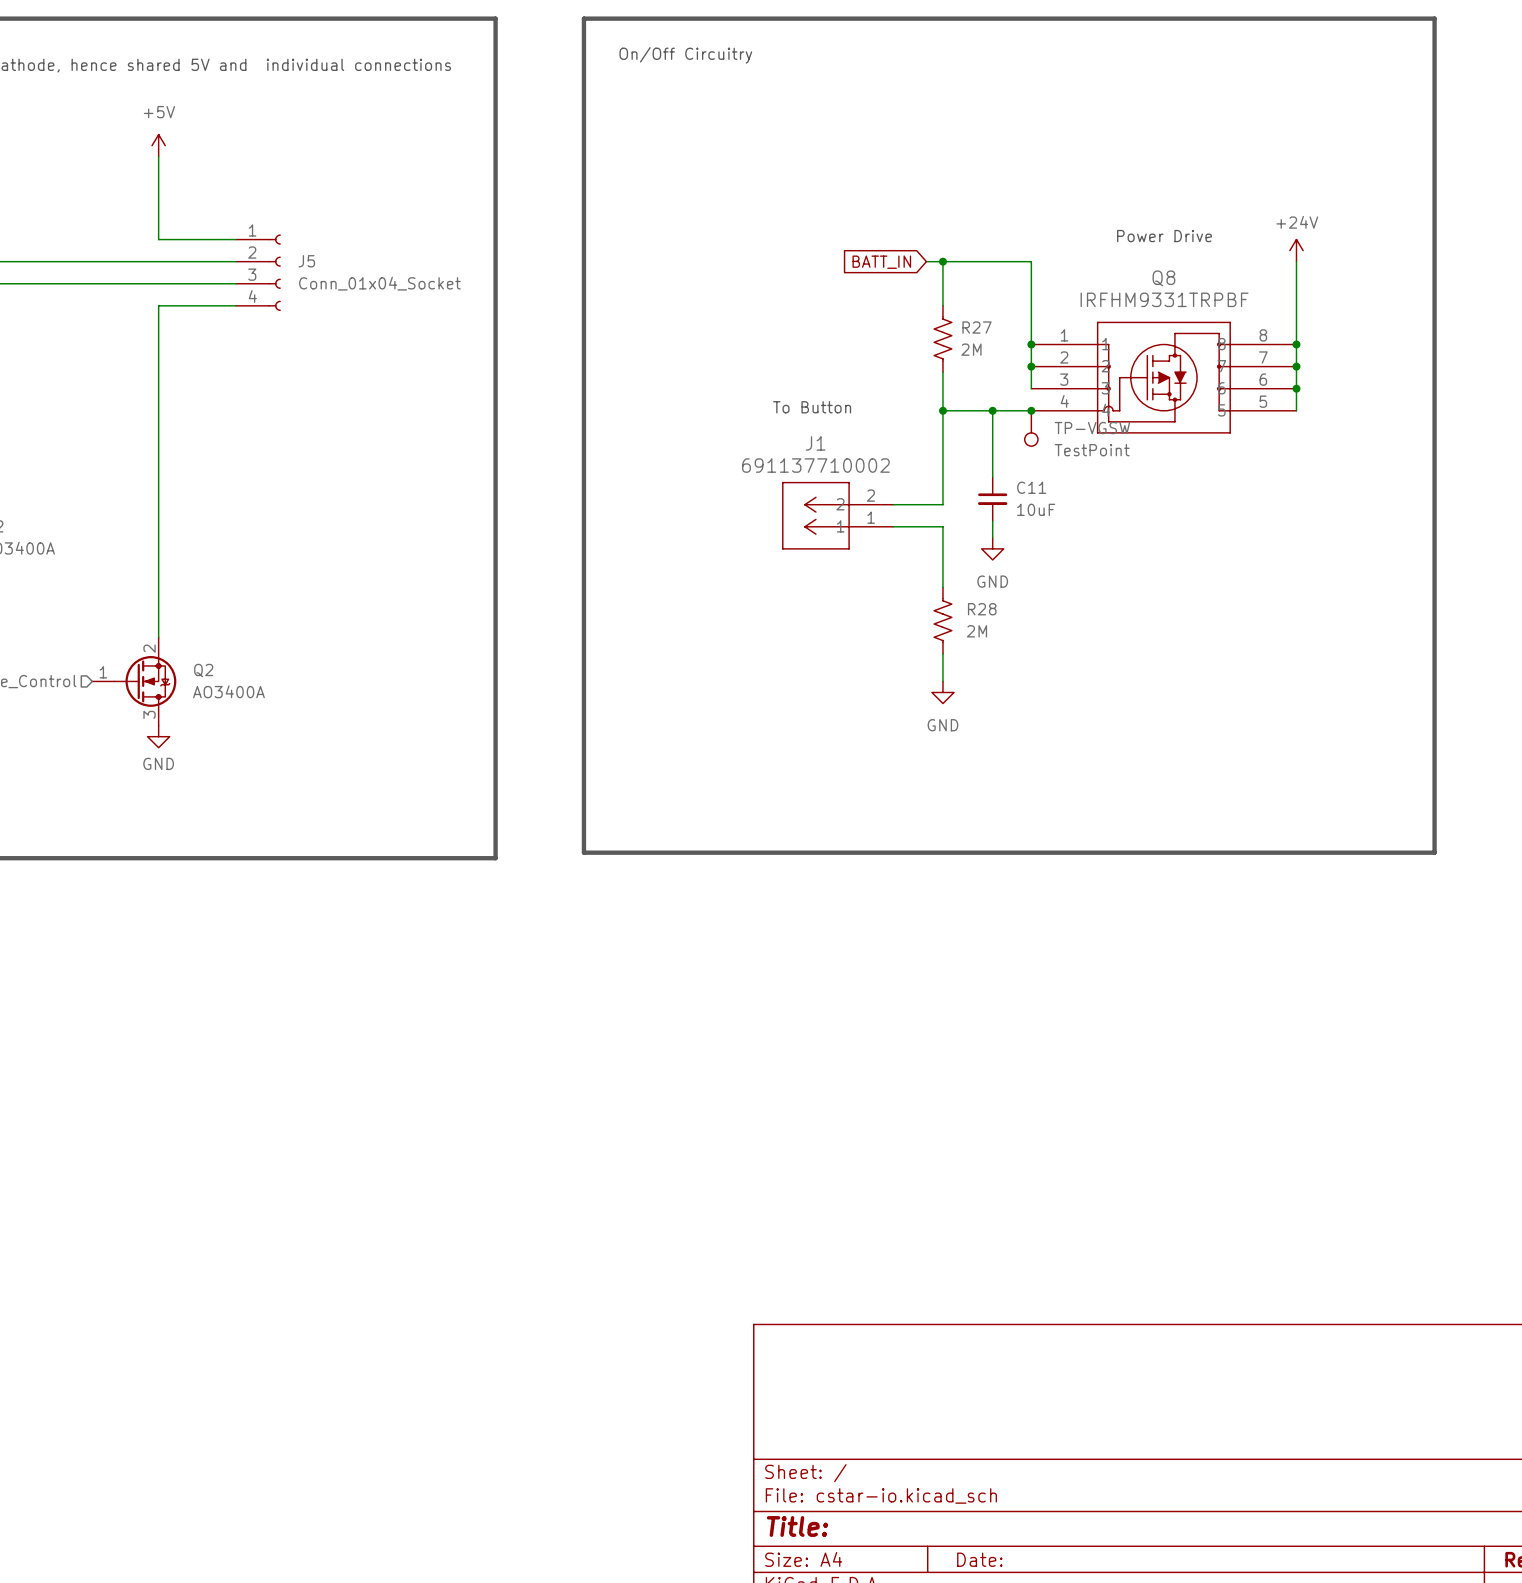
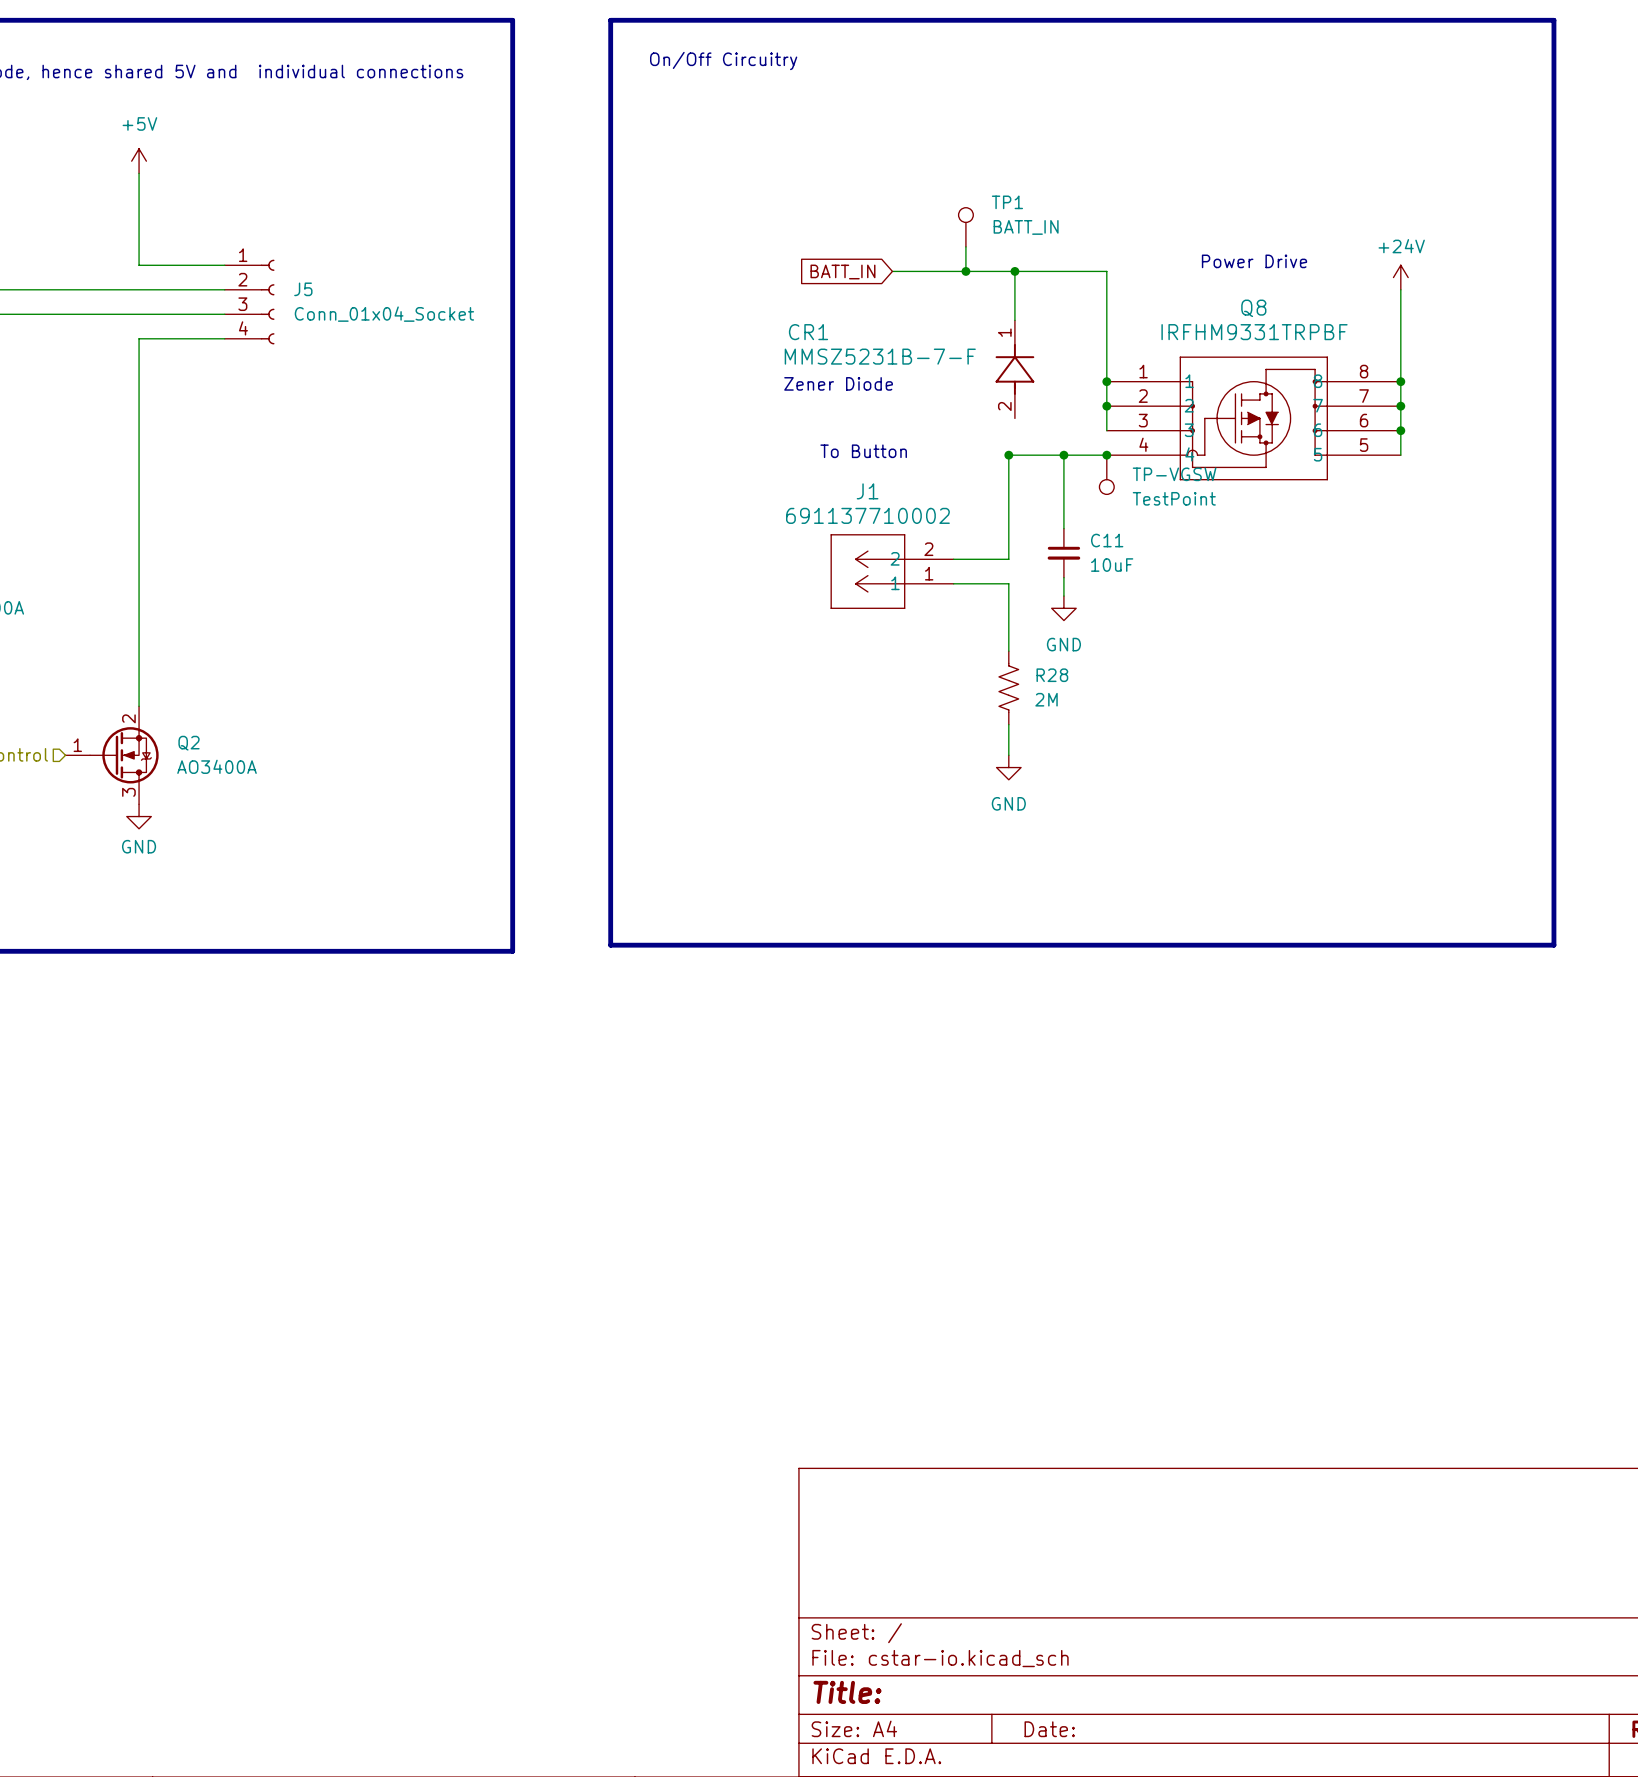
TP1: none -> BATT_IN (965, 227)
wire: none -> (965, 246) (965, 271)
junction: none -> (965, 271)
wire: (926, 261) (1031, 261) -> (892, 271) (1106, 271) (1106, 289)
wire: (942, 261) (942, 305) -> (1014, 271) (1014, 320)
junction position: (942, 261) -> (1014, 271)
global label position: BATT_IN (881, 262) -> BATT_IN (842, 272)
CR1: none -> MMSZ5231B-7-F (1014, 369)
R27: 2M (942, 338) -> none
text: none -> Zener Diode (838, 383)
wire: (942, 372) (942, 410) -> none

